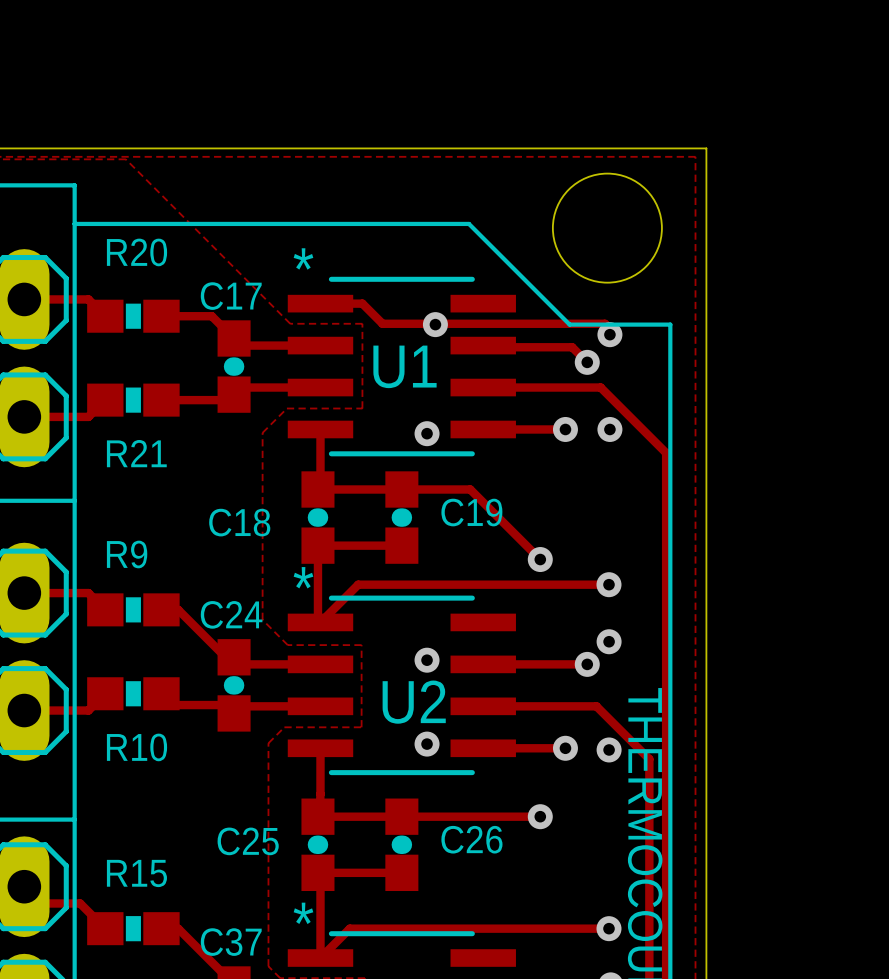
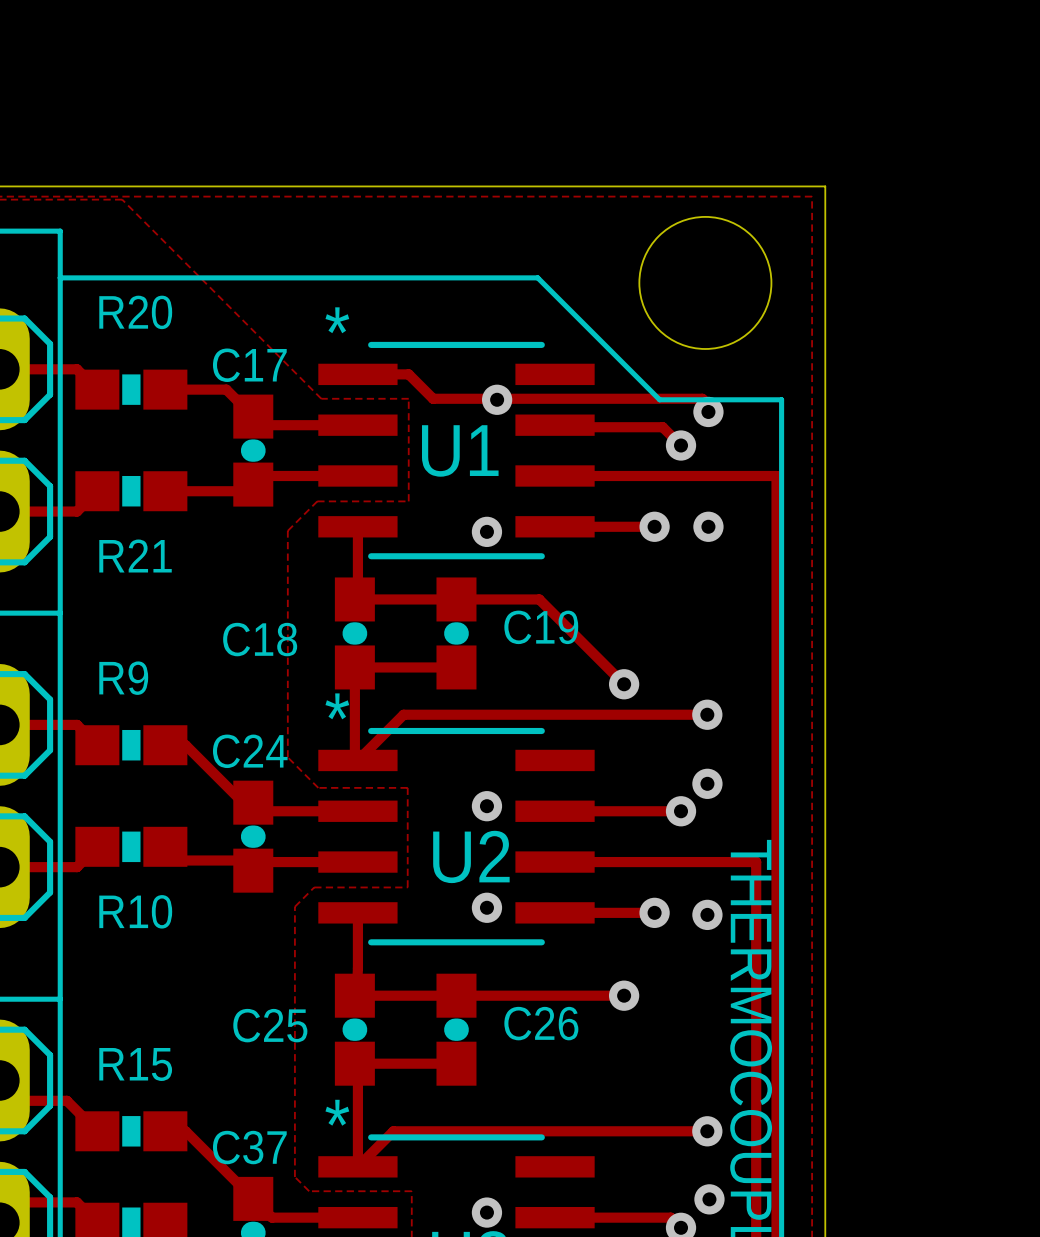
track: (600, 387) (666, 452) -> (697, 475) (776, 475) (776, 555)
track: (596, 706) (649, 759) -> (692, 862) (756, 862) (756, 926)

